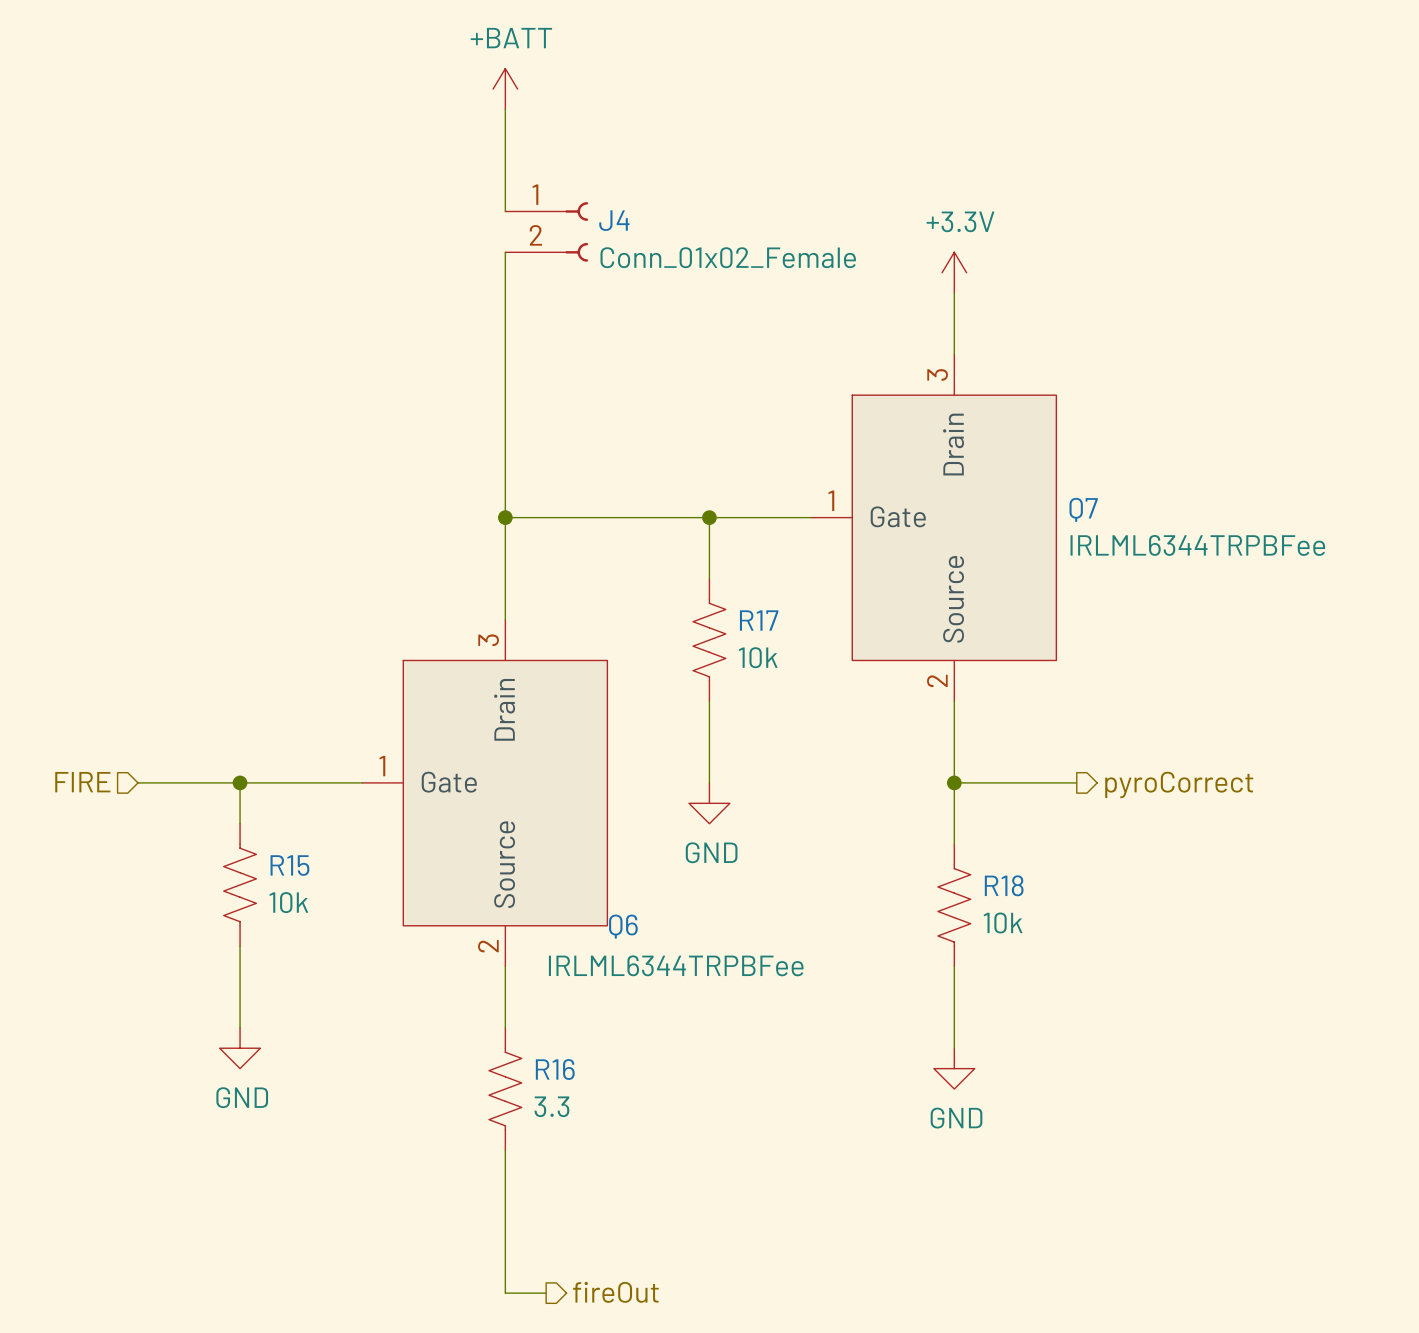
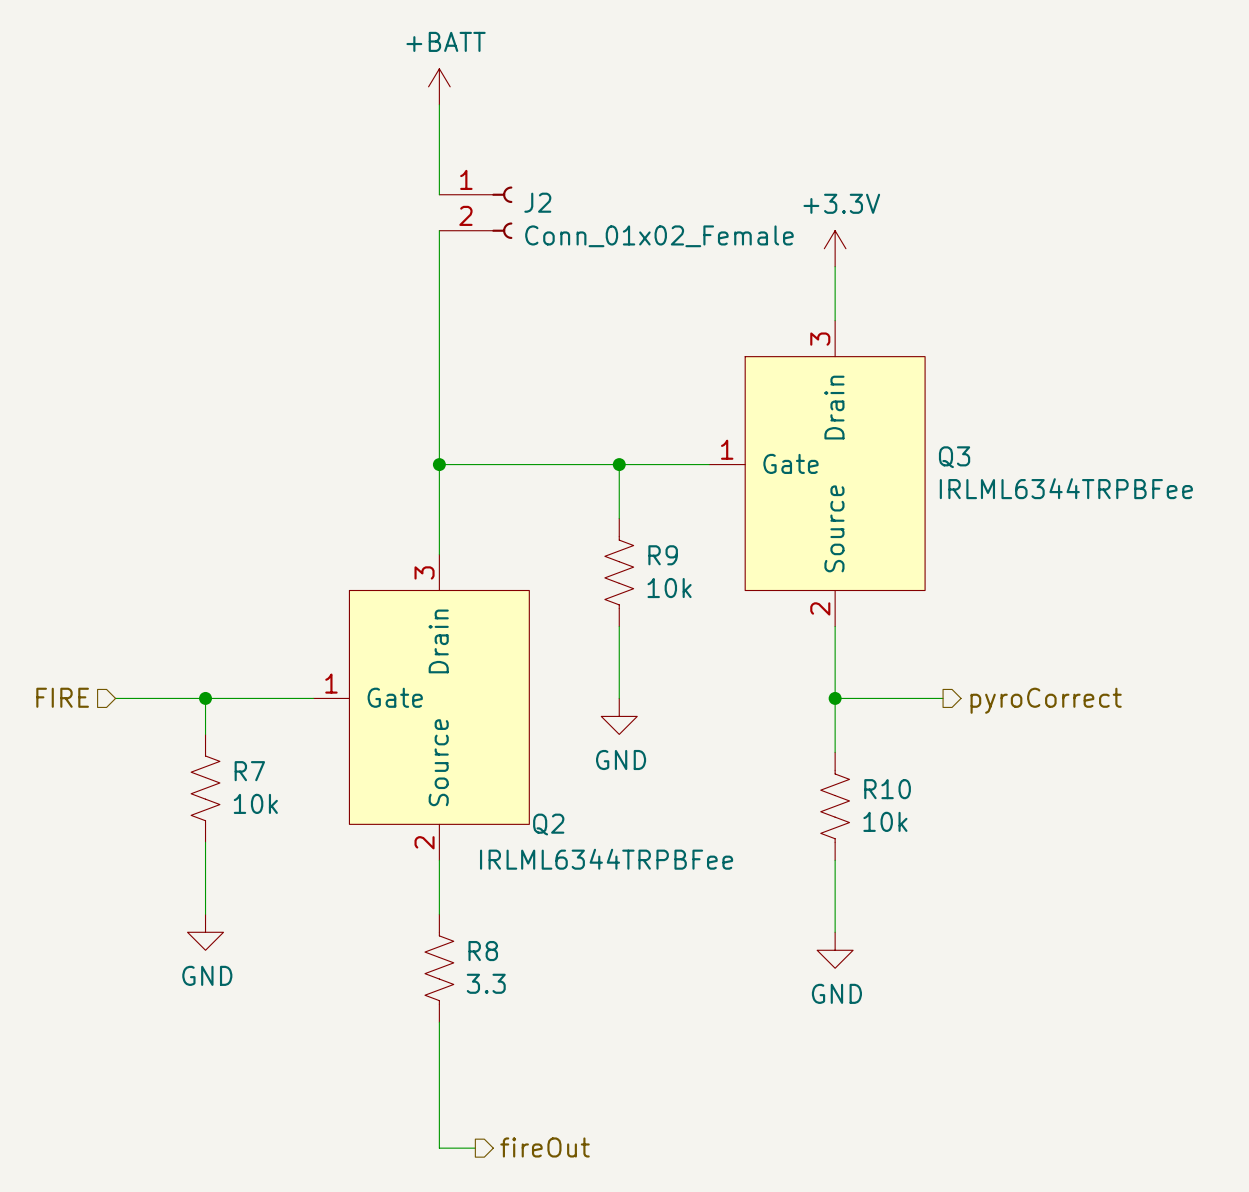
J4 name: J4 (614, 220) -> J2 (537, 202)
Q7 name: Q7 (1083, 509) -> Q3 (954, 457)
R17 name: R17 (759, 620) -> R9 (663, 555)
R15 name: R15 (289, 865) -> R7 (249, 771)
R18 name: R18 (1004, 885) -> R10 (887, 789)
Q6 name: Q6 (623, 926) -> Q2 (548, 824)
R16 name: R16 (555, 1069) -> R8 (483, 951)

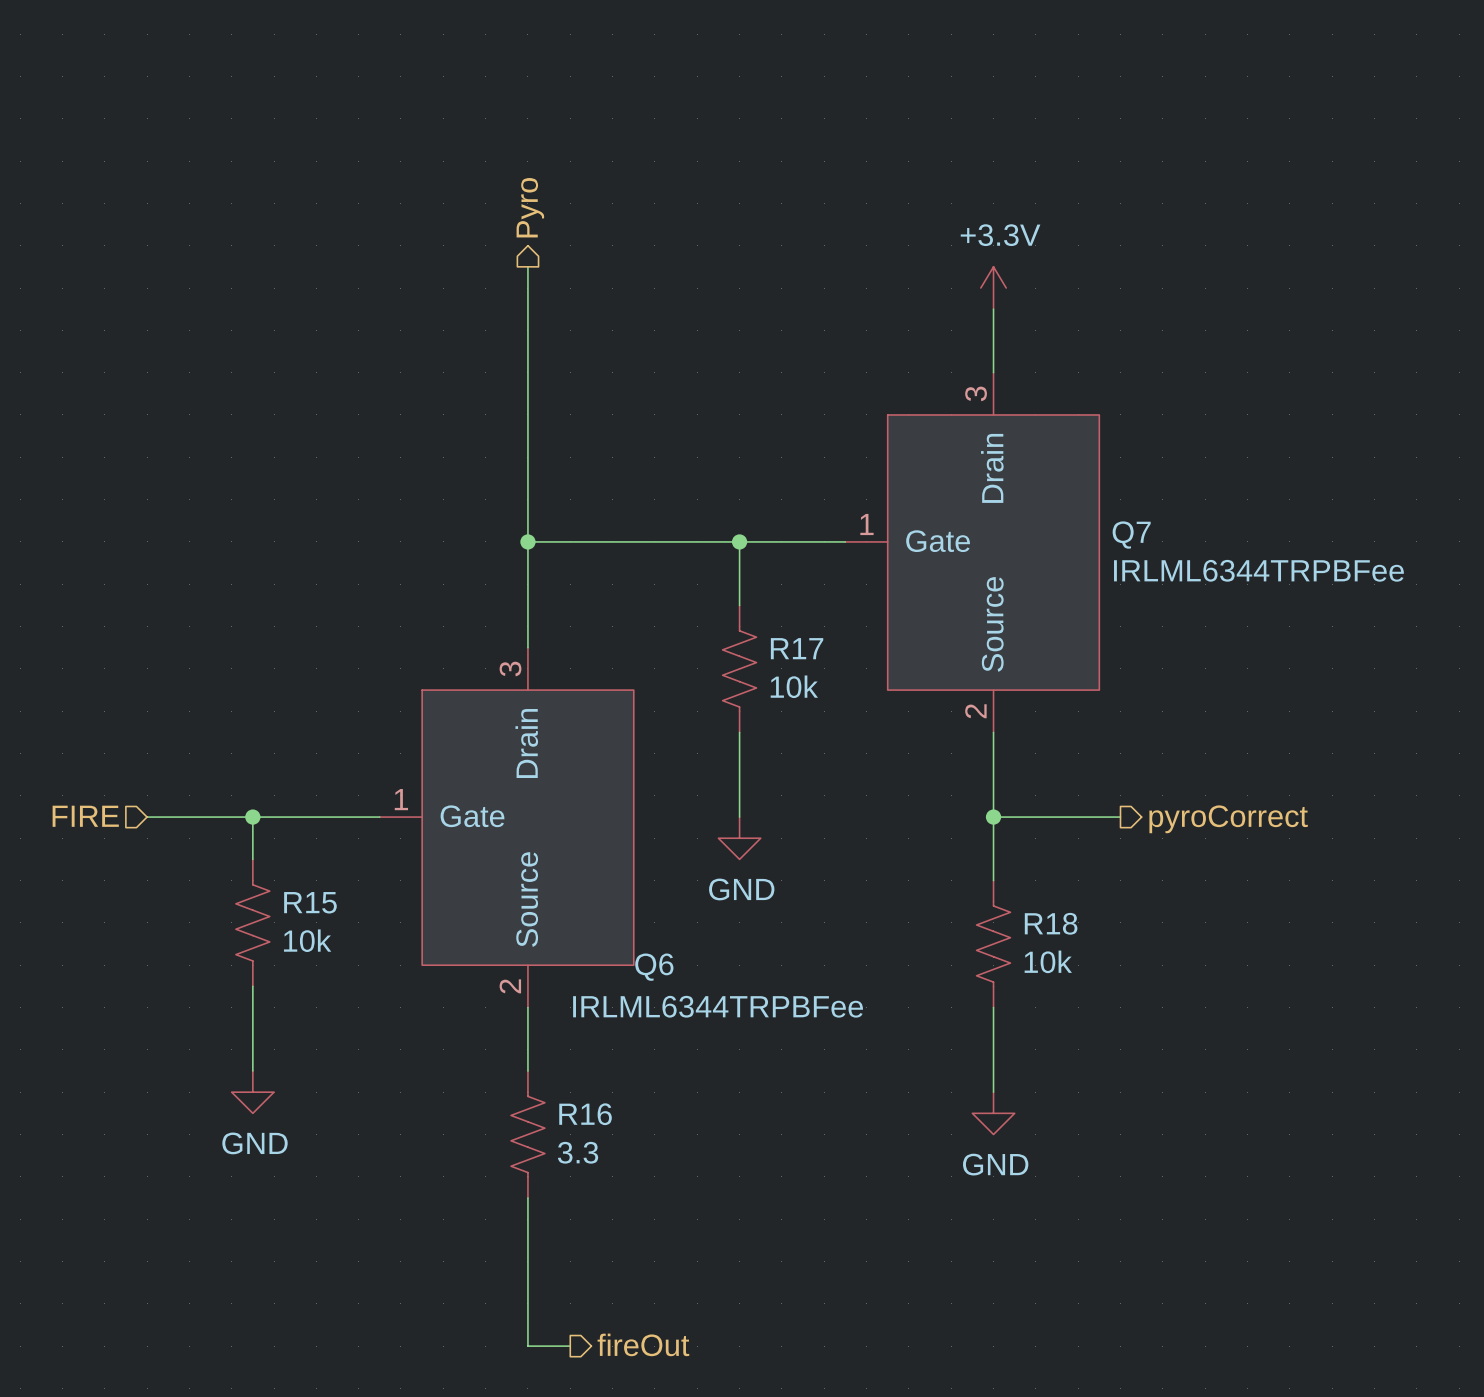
power symbol: +BATT (439, 86) -> none
wire: (439, 104) (439, 194) -> none
hierarchical label: none -> Pyro (530, 207)
J2: Conn_01x02_Female (475, 212) -> none
Q3 name: Q3 (954, 457) -> Q7 (1131, 535)
R9 name: R9 (663, 555) -> R17 (797, 648)
R7 name: R7 (249, 771) -> R15 (310, 902)
R10 name: R10 (887, 789) -> R18 (1051, 923)
Q2 name: Q2 (548, 824) -> Q6 (654, 967)
R8 name: R8 (483, 951) -> R16 (585, 1114)

